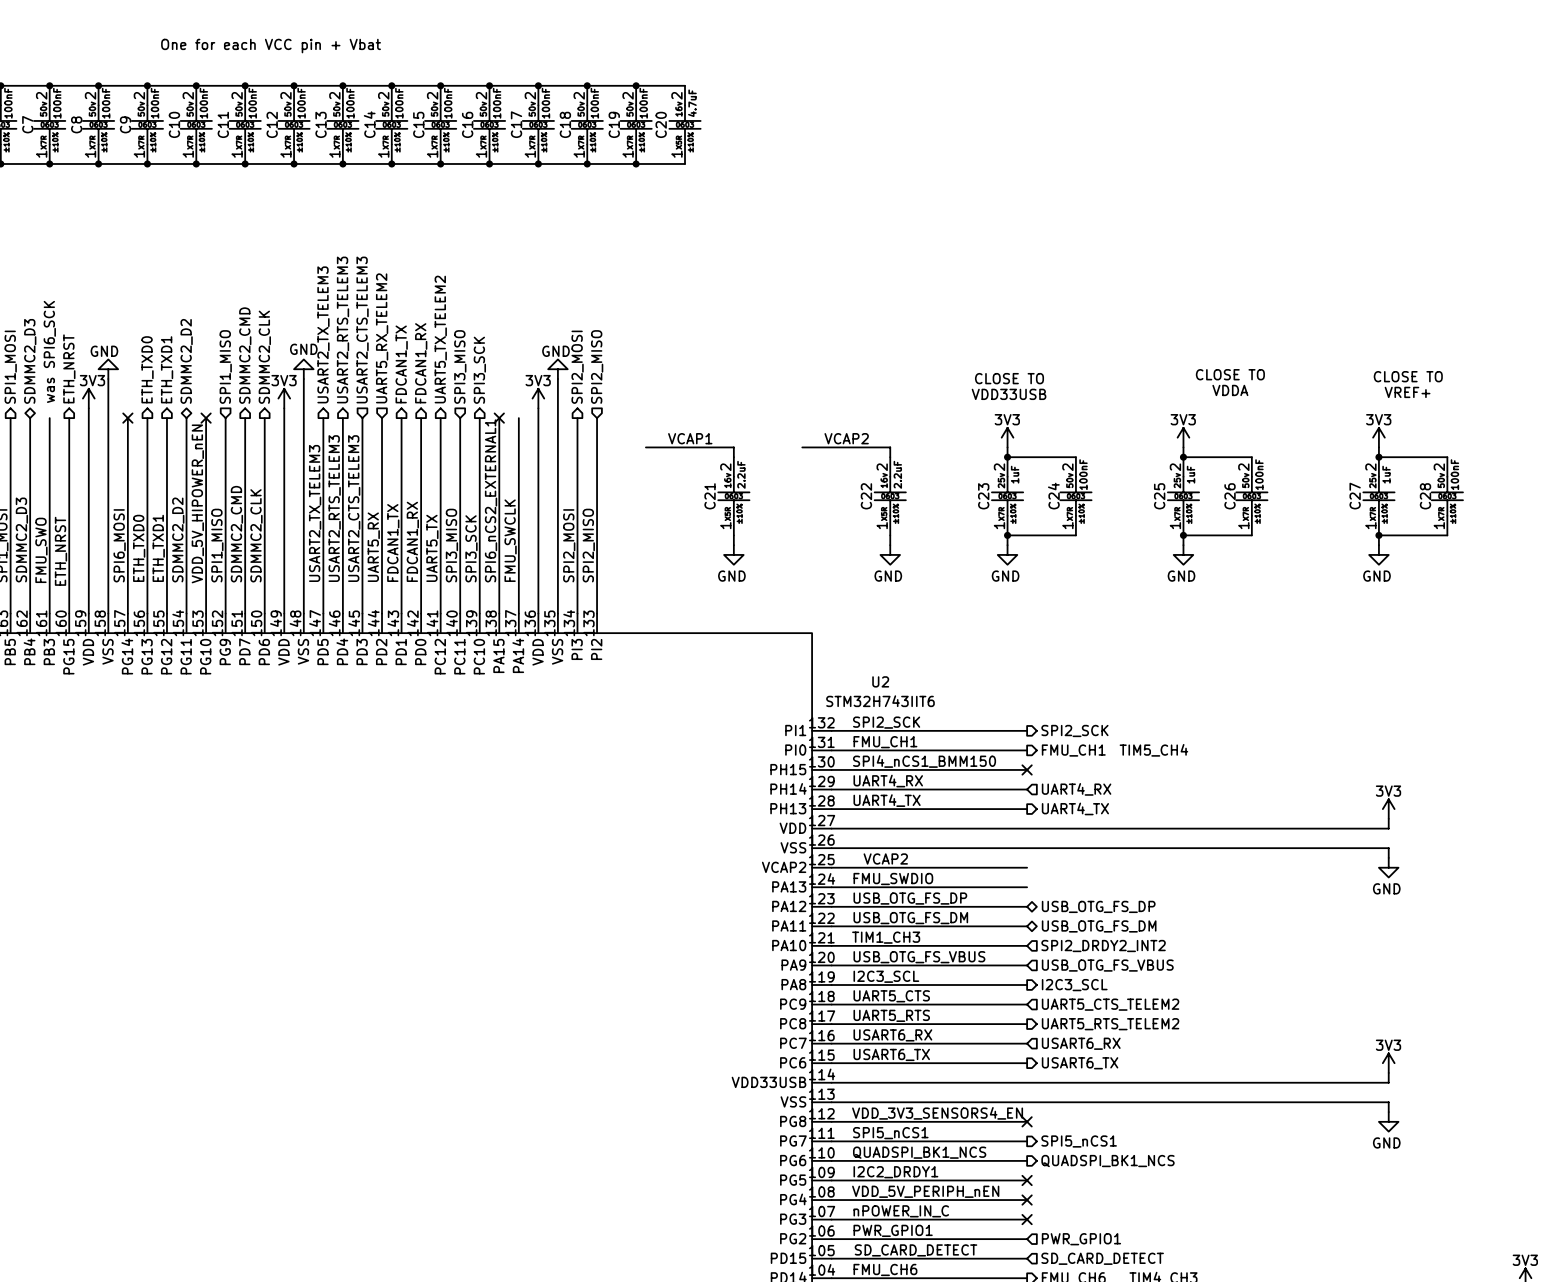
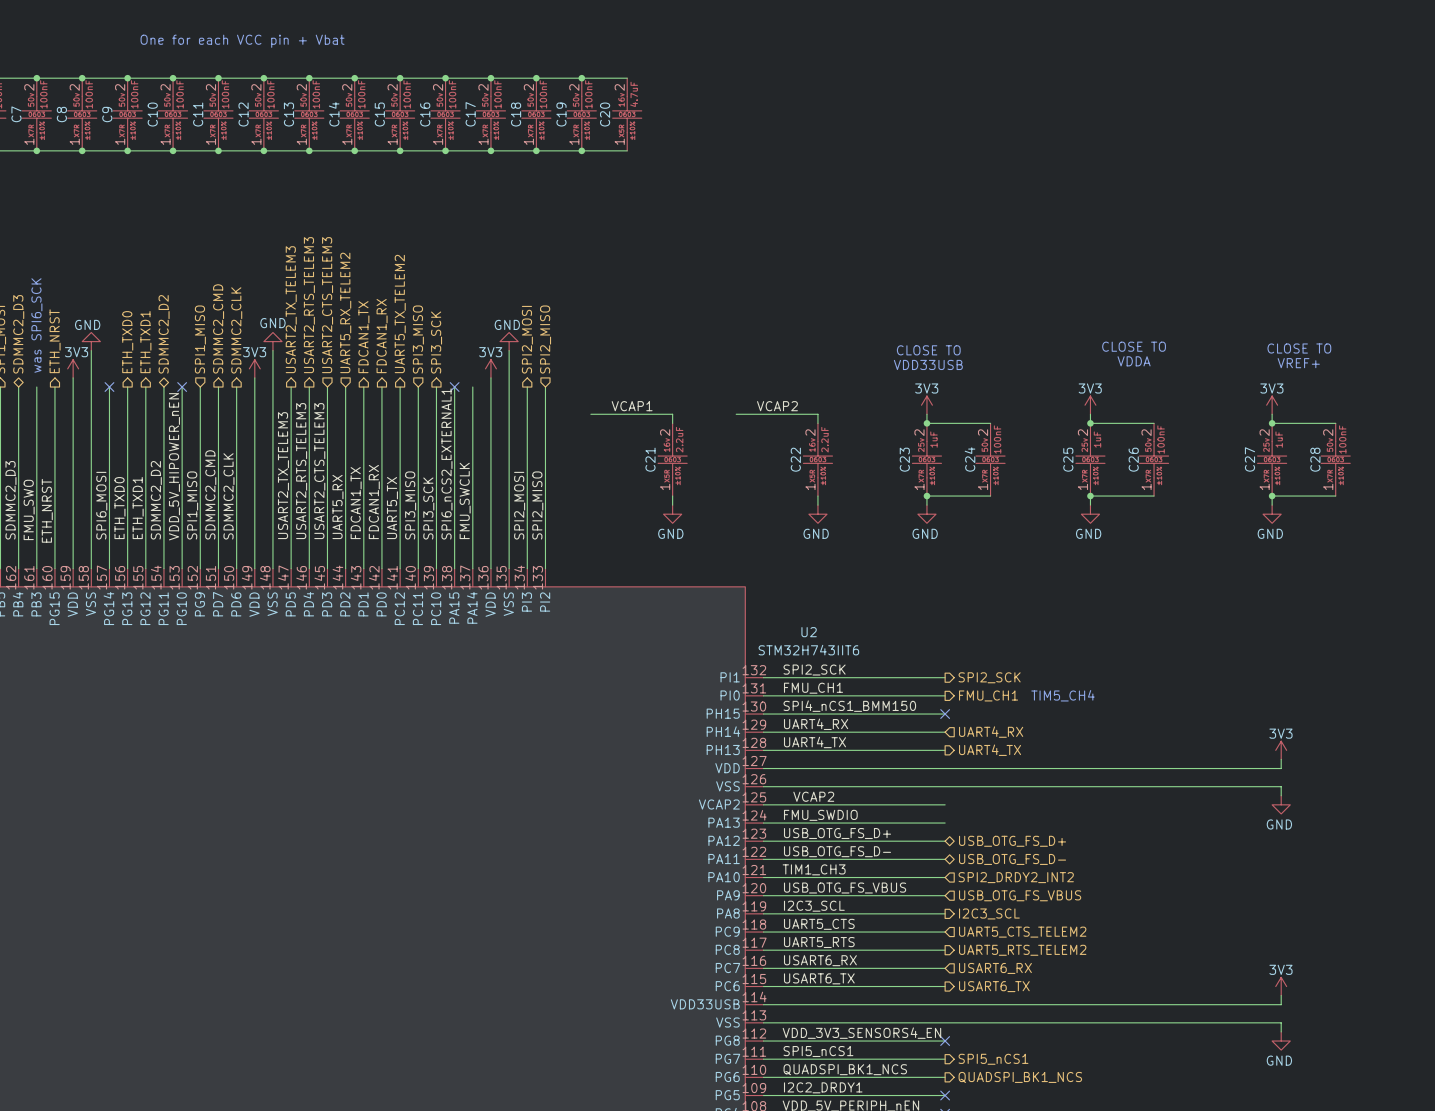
label: USB_OTG_FS_DP (910, 898) -> USB_OTG_FS_D+ (837, 833)
hierarchical label: USB_OTG_FS_DP (1098, 906) -> USB_OTG_FS_D+ (1012, 841)
label: USB_OTG_FS_DM (910, 918) -> USB_OTG_FS_D- (837, 851)
hierarchical label: USB_OTG_FS_DM (1099, 926) -> USB_OTG_FS_D- (1012, 859)

